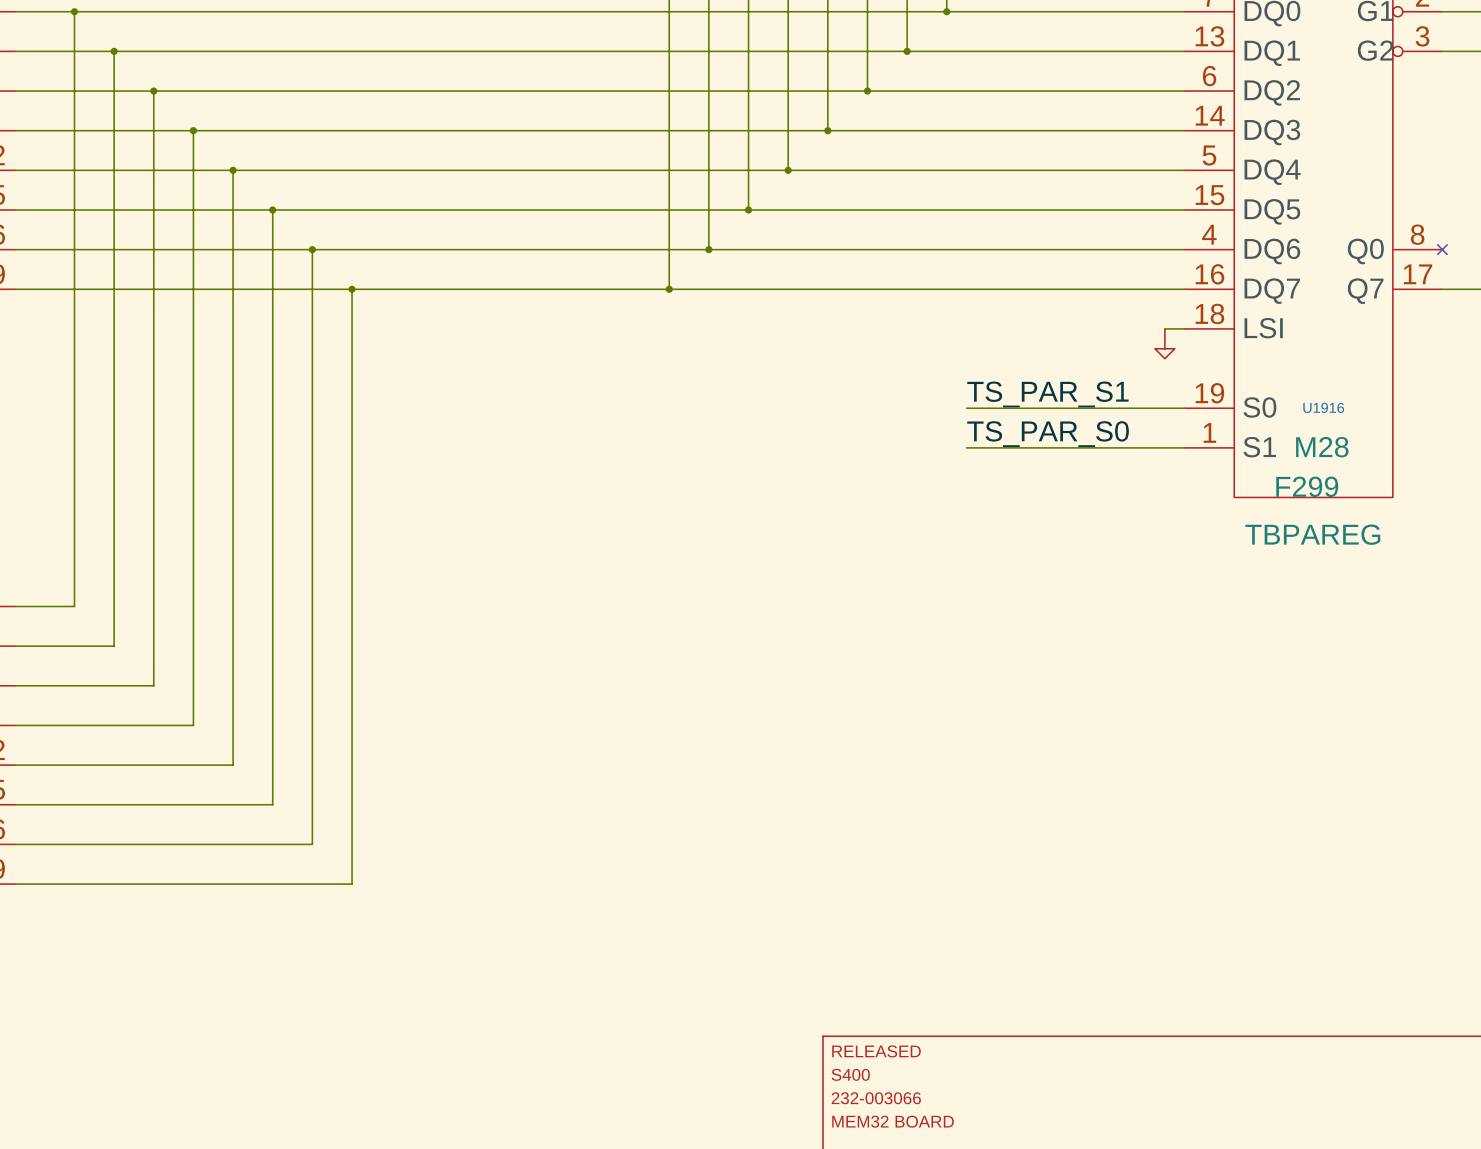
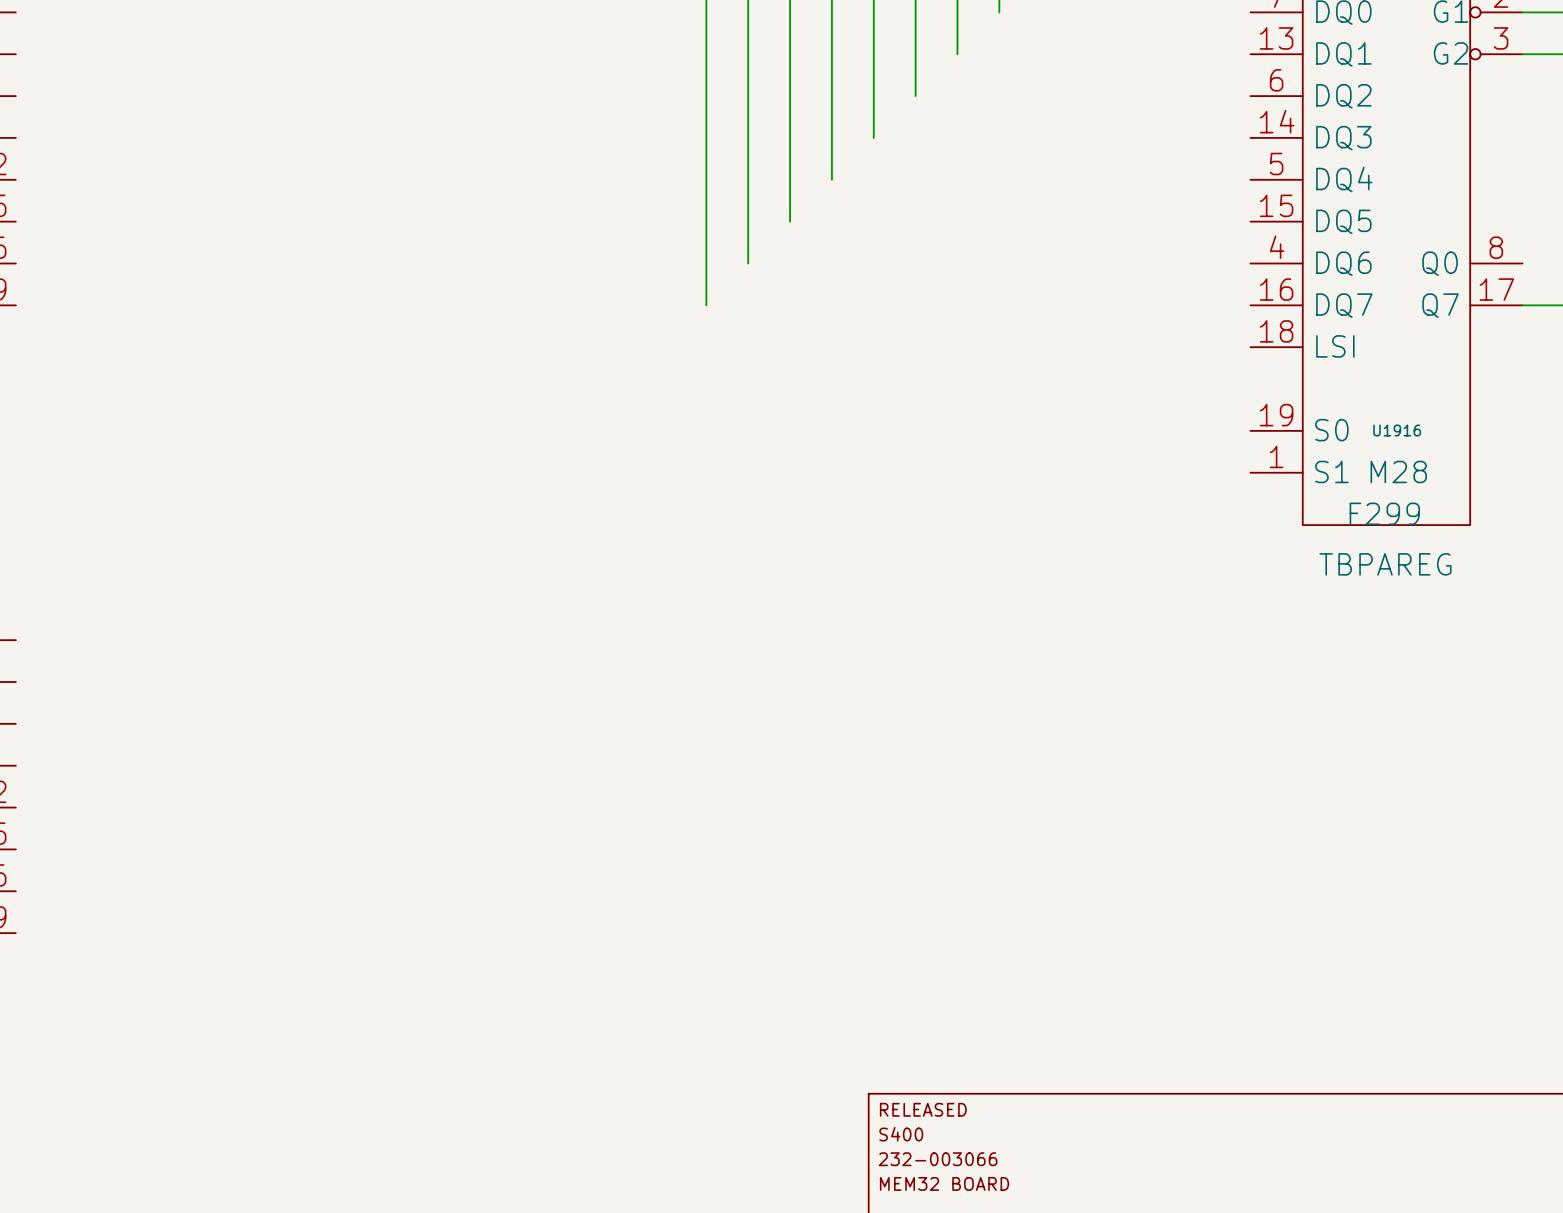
wire: (14, 11) (1184, 11) -> none
wire: (74, 11) (74, 606) (14, 606) -> none
junction: (74, 11) -> none
junction: (946, 11) -> none
wire: (14, 51) (1184, 51) -> none
wire: (114, 51) (114, 646) (14, 646) -> none
junction: (114, 51) -> none
junction: (907, 51) -> none
wire: (14, 91) (1184, 91) -> none
wire: (153, 91) (153, 685) (14, 685) -> none
junction: (153, 91) -> none
junction: (867, 91) -> none
wire: (14, 130) (1184, 130) -> none
wire: (193, 130) (193, 725) (14, 725) -> none
junction: (193, 130) -> none
junction: (827, 130) -> none
wire: (14, 170) (1184, 170) -> none
wire: (233, 170) (233, 765) (14, 765) -> none
junction: (233, 170) -> none
junction: (788, 170) -> none
wire: (14, 209) (1184, 209) -> none
wire: (272, 209) (272, 804) (14, 804) -> none
junction: (272, 209) -> none
junction: (748, 209) -> none
wire: (14, 249) (1184, 249) -> none
wire: (312, 249) (312, 844) (14, 844) -> none
junction: (312, 249) -> none
junction: (708, 249) -> none
no-connect mark: (1442, 249) -> none
wire: (14, 289) (1184, 289) -> none
wire: (352, 289) (352, 884) (14, 884) -> none
junction: (352, 289) -> none
junction: (669, 289) -> none
wire: (1164, 328) (1184, 328) -> none
power symbol: (1164, 344) -> none
label: TS_PAR_S1 (1047, 394) -> none
wire: (966, 408) (1184, 408) -> none
label: TS_PAR_S0 (1048, 434) -> none
wire: (966, 447) (1184, 447) -> none

